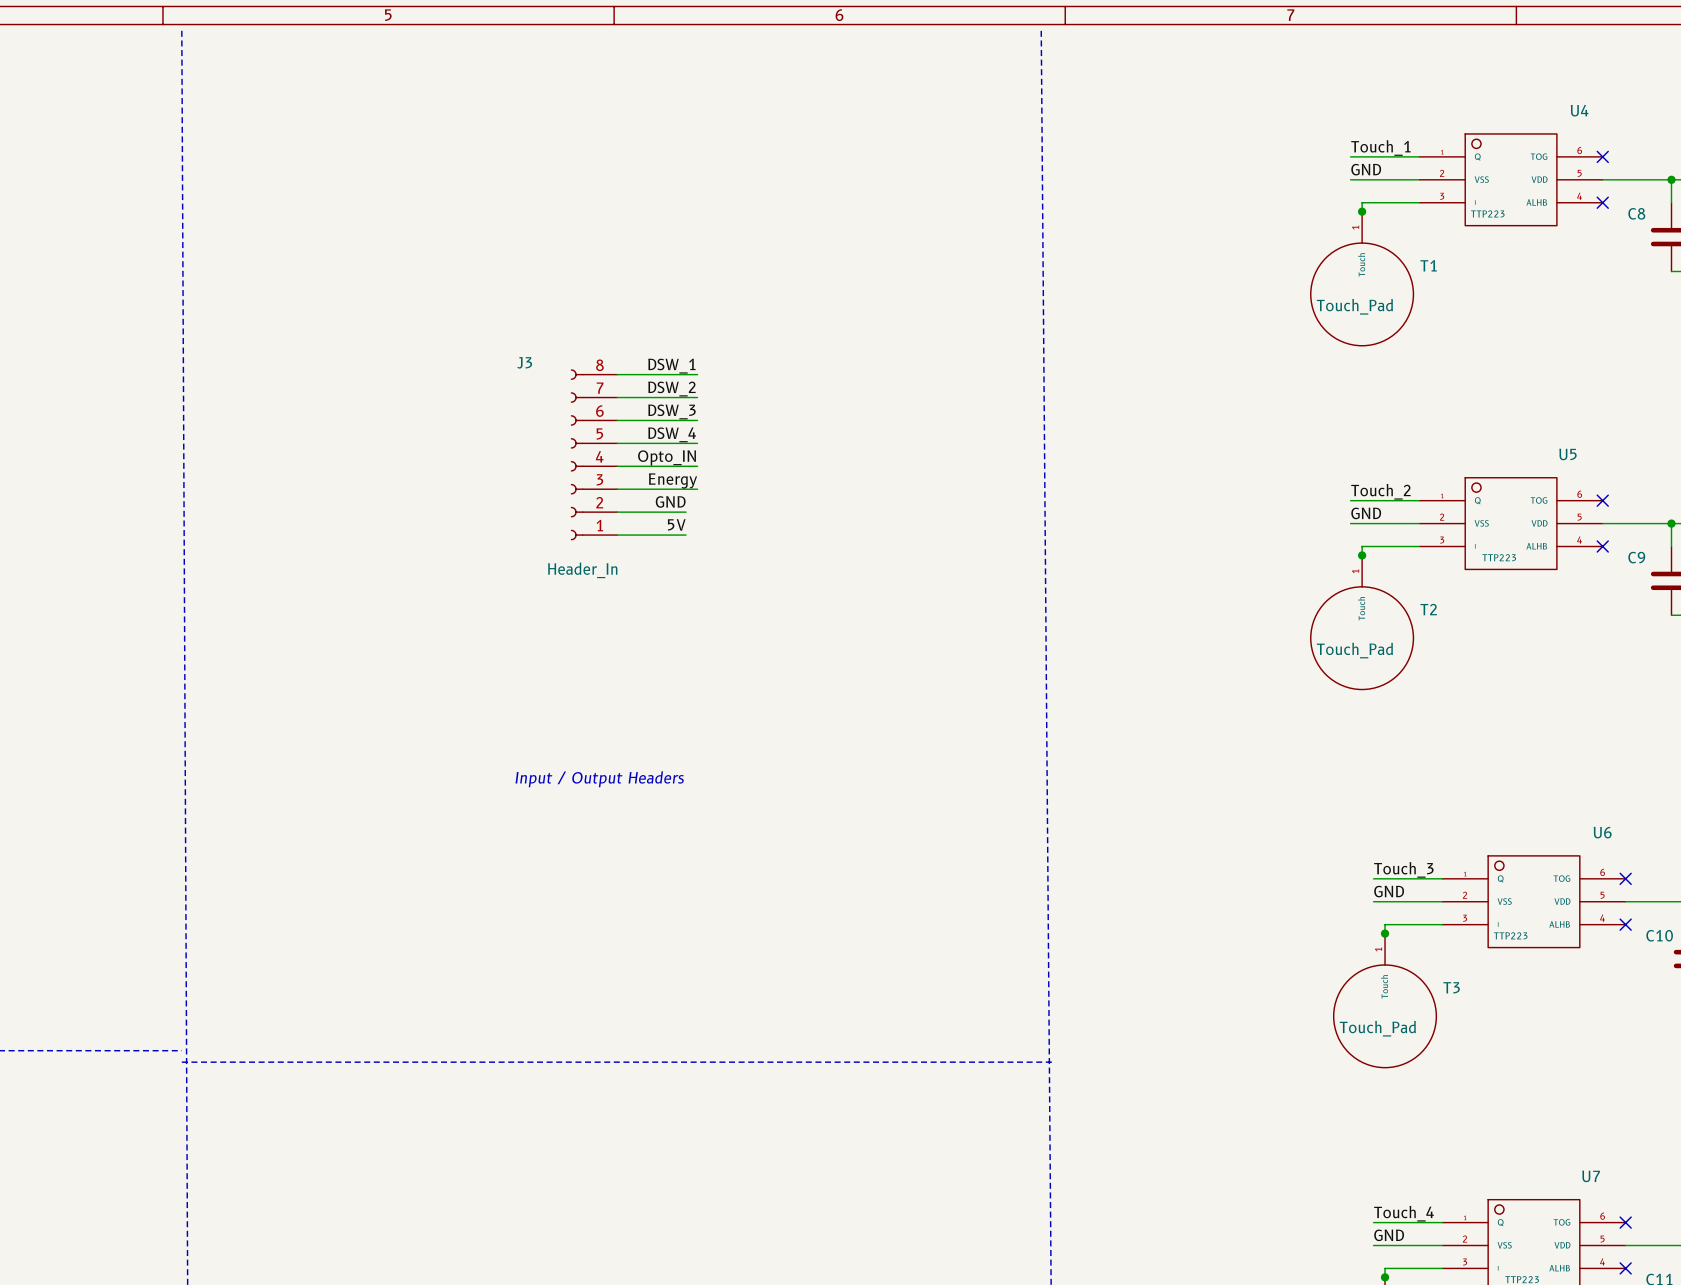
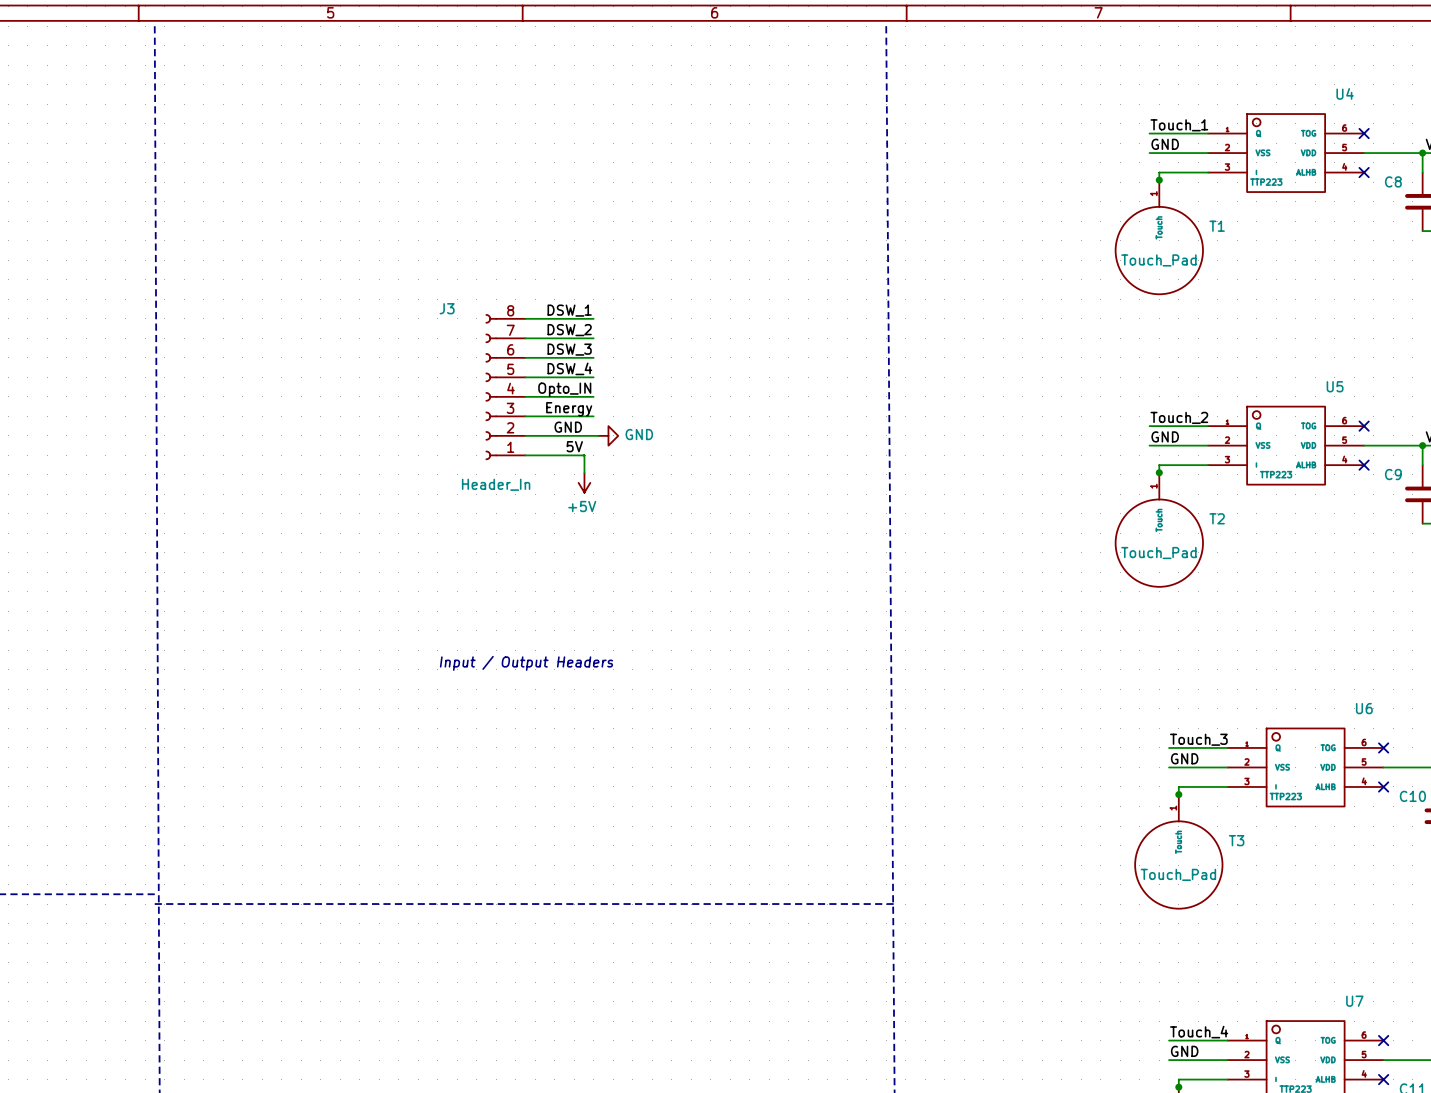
wire: none -> (583, 435) (598, 435)
power symbol: none -> GND (608, 435)
wire: none -> (584, 455) (584, 473)
power symbol: none -> +5V (584, 482)

